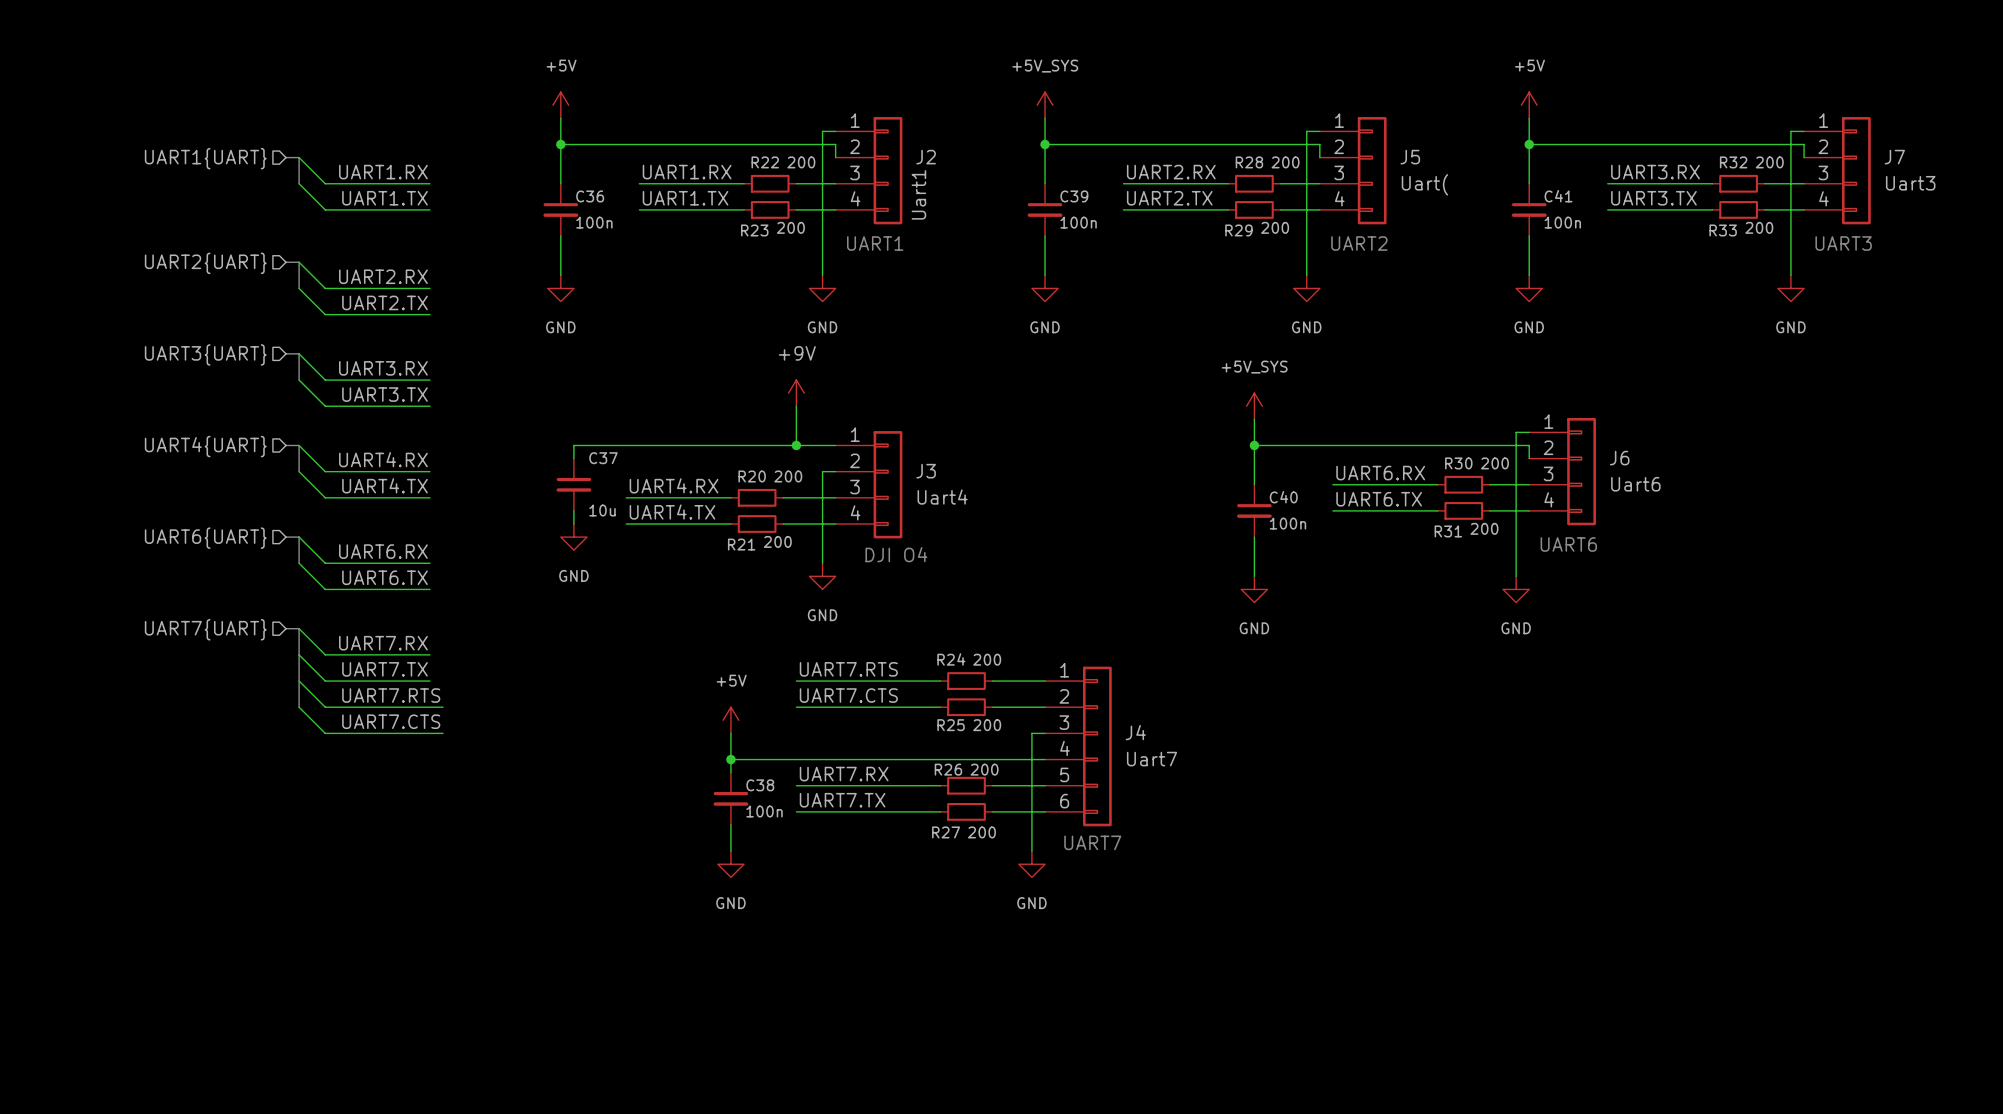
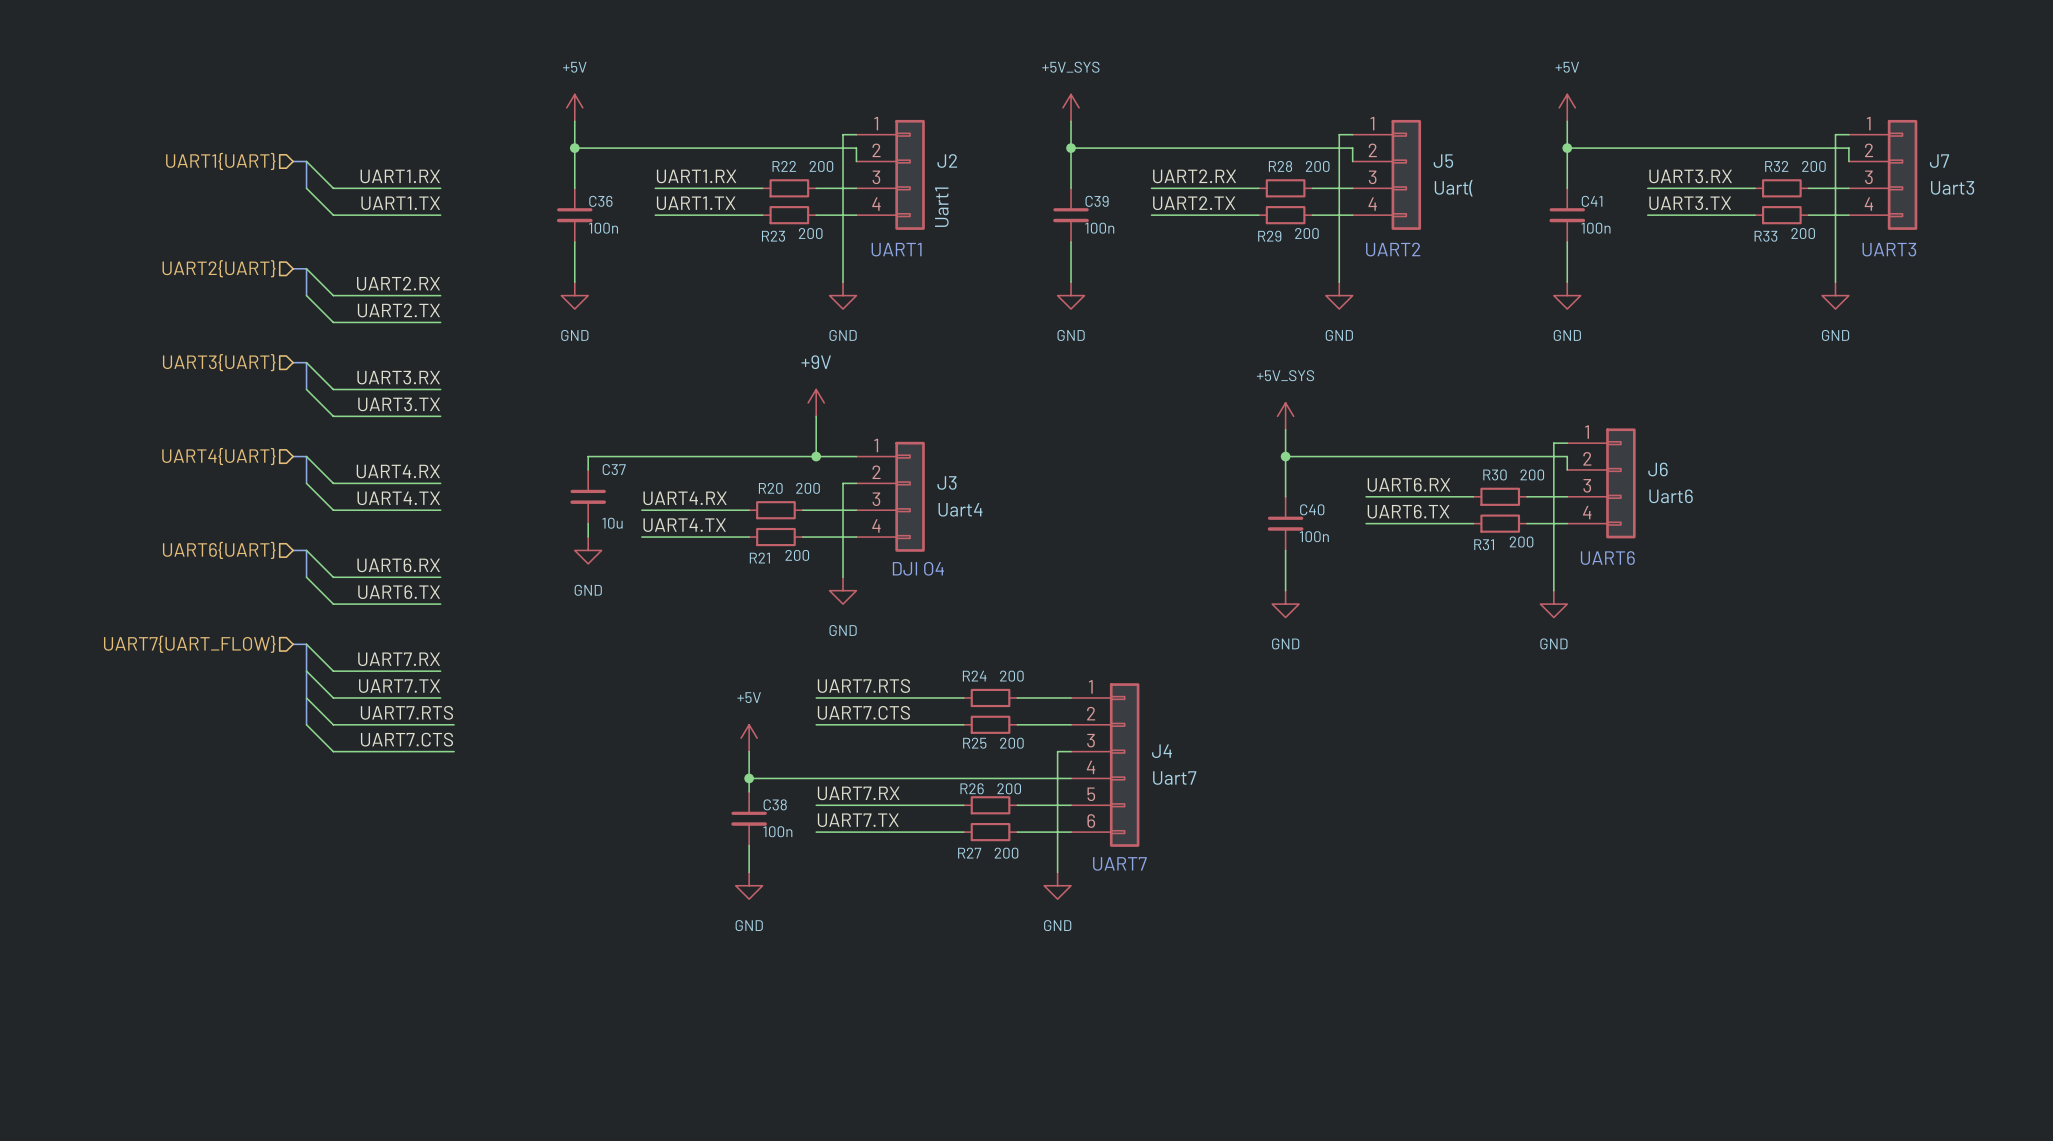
hierarchical label: UART7{UART} (205, 629) -> UART7{UART_FLOW} (189, 644)

